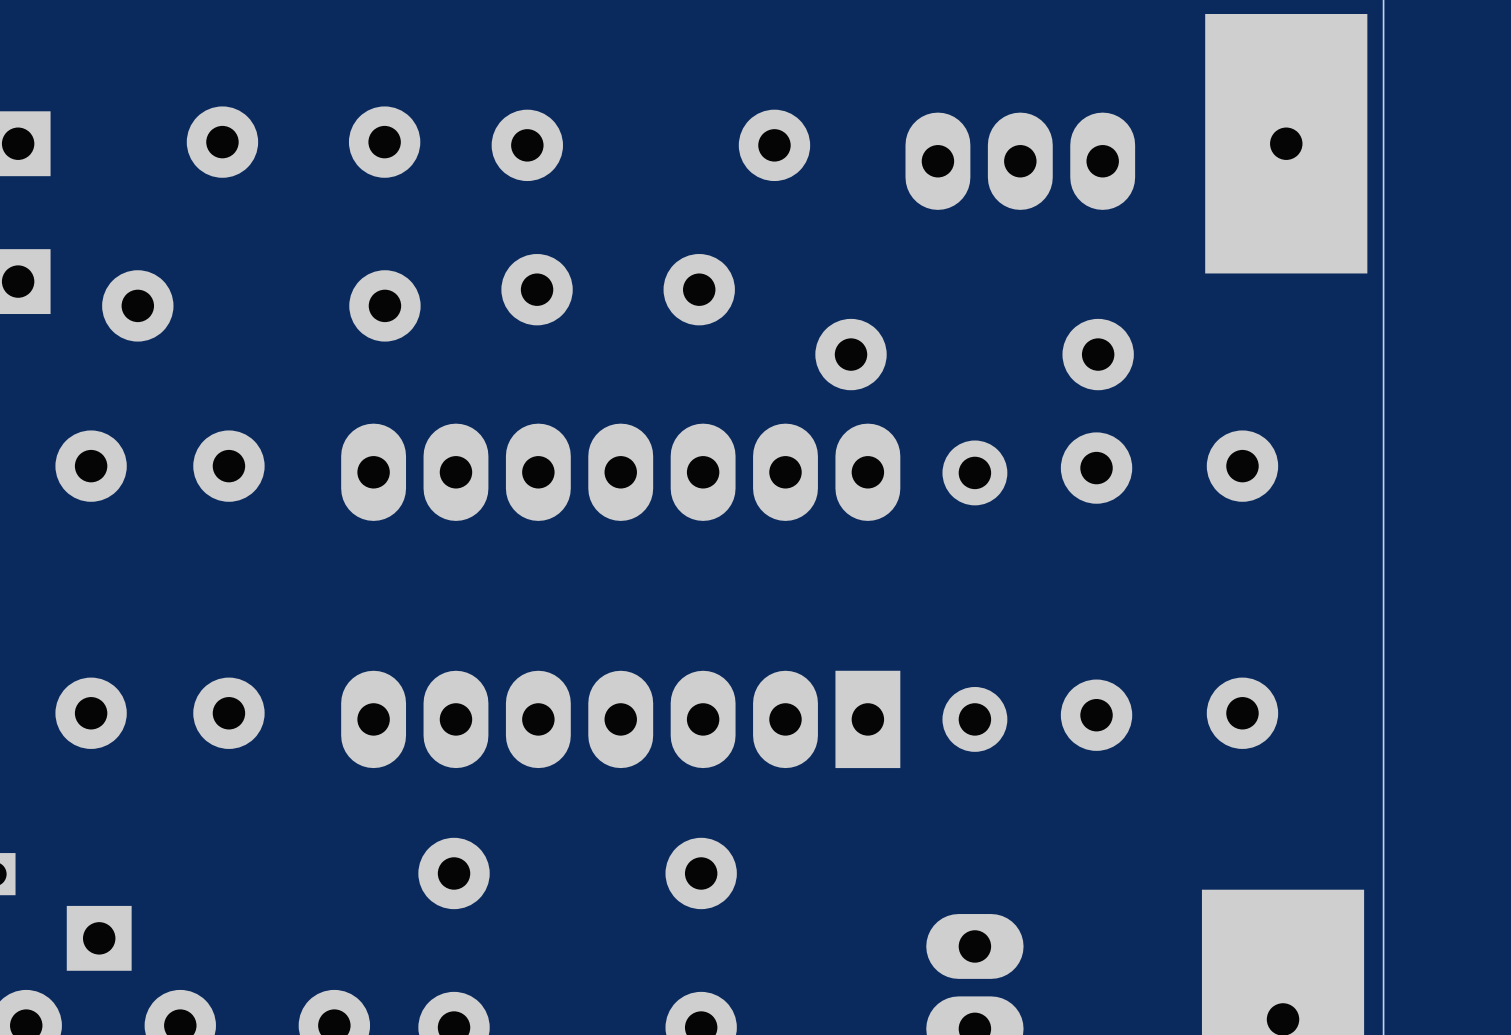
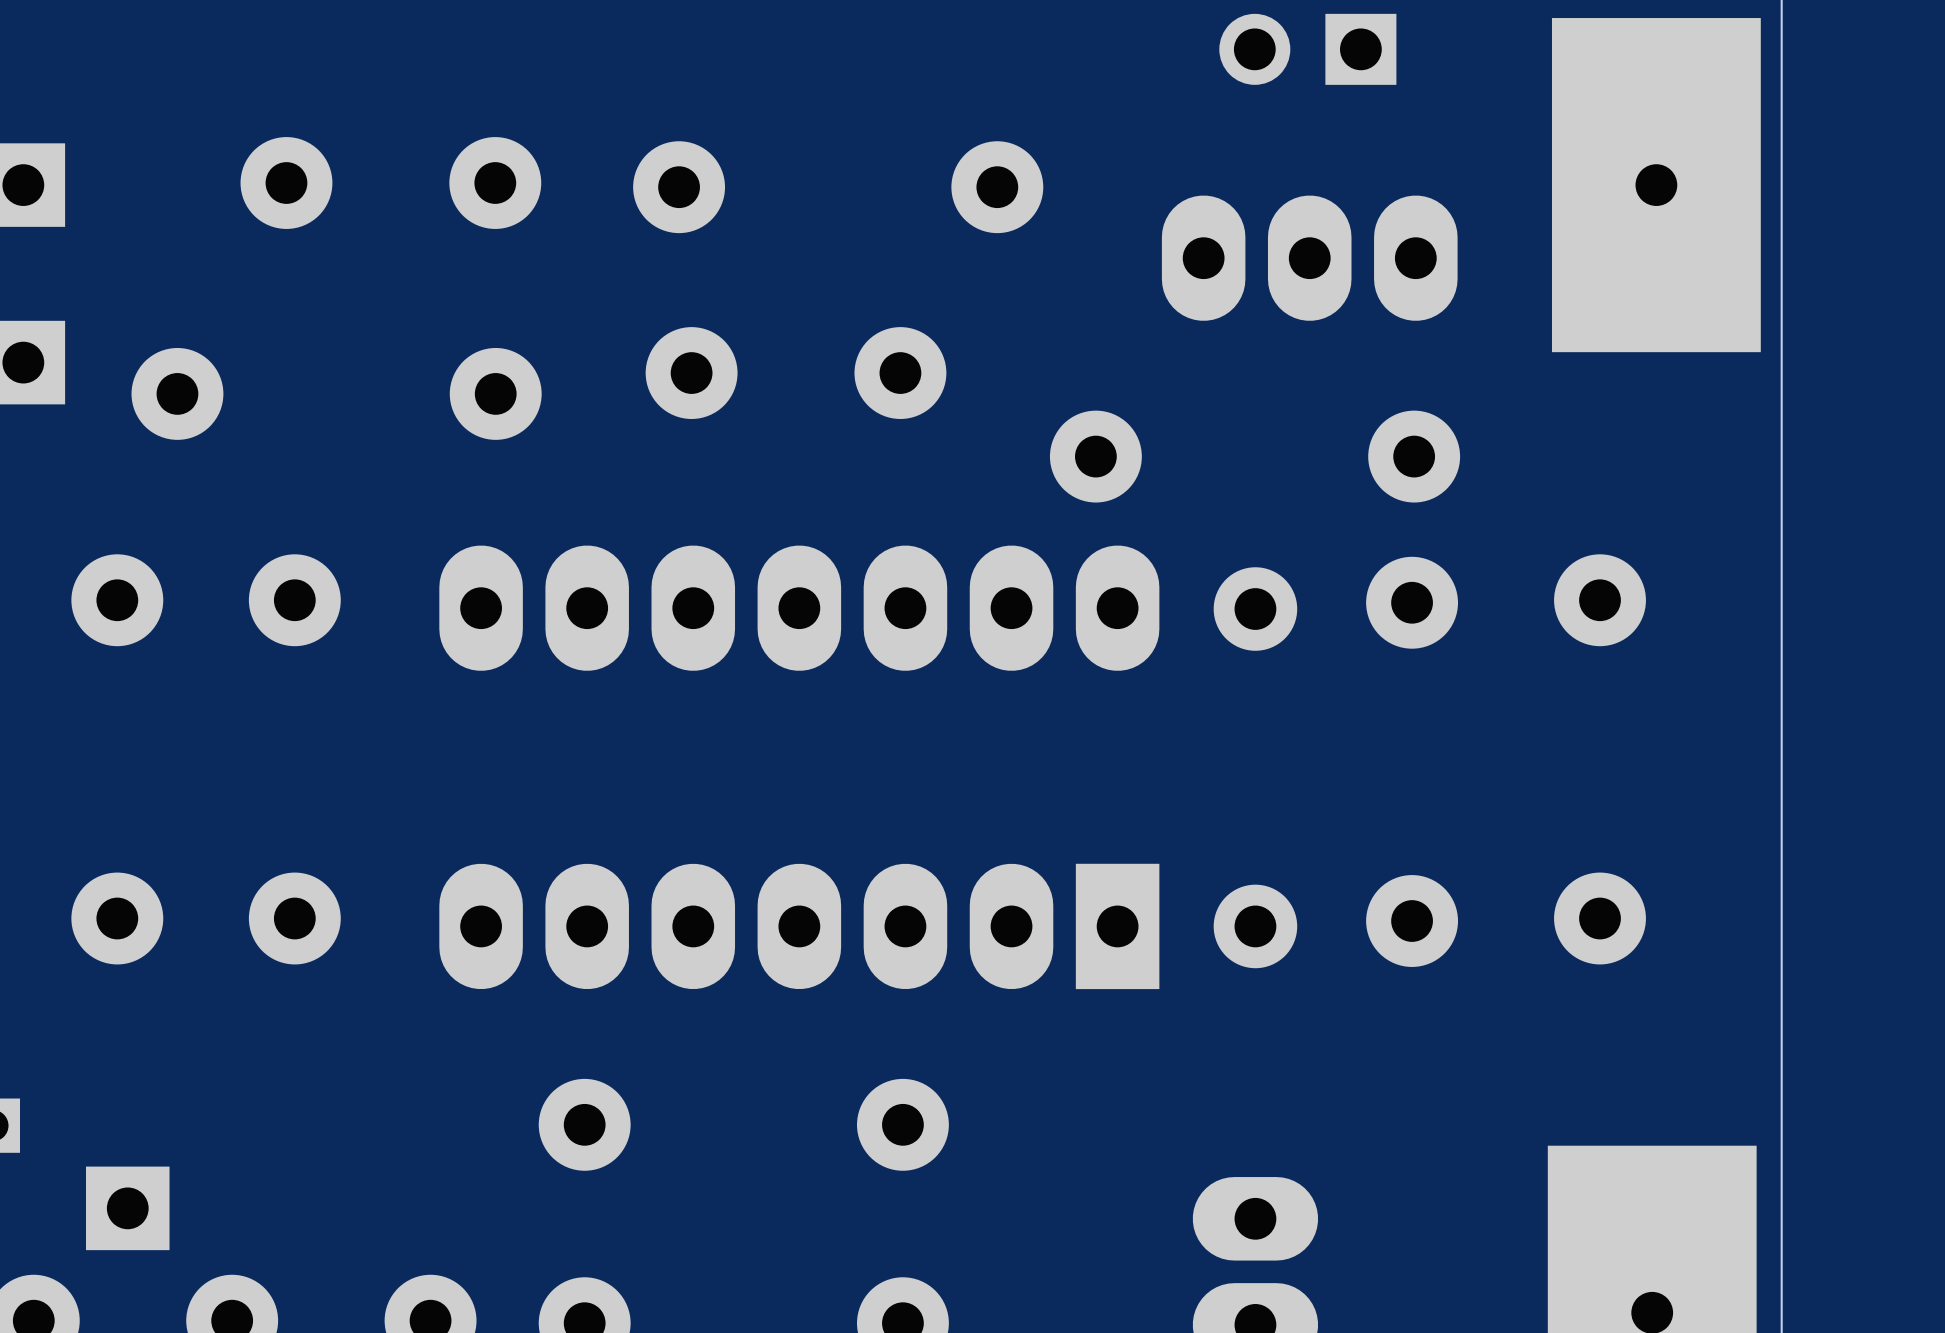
part: none -> (1307, 49)
part position: (1020, 161) -> (1309, 258)

